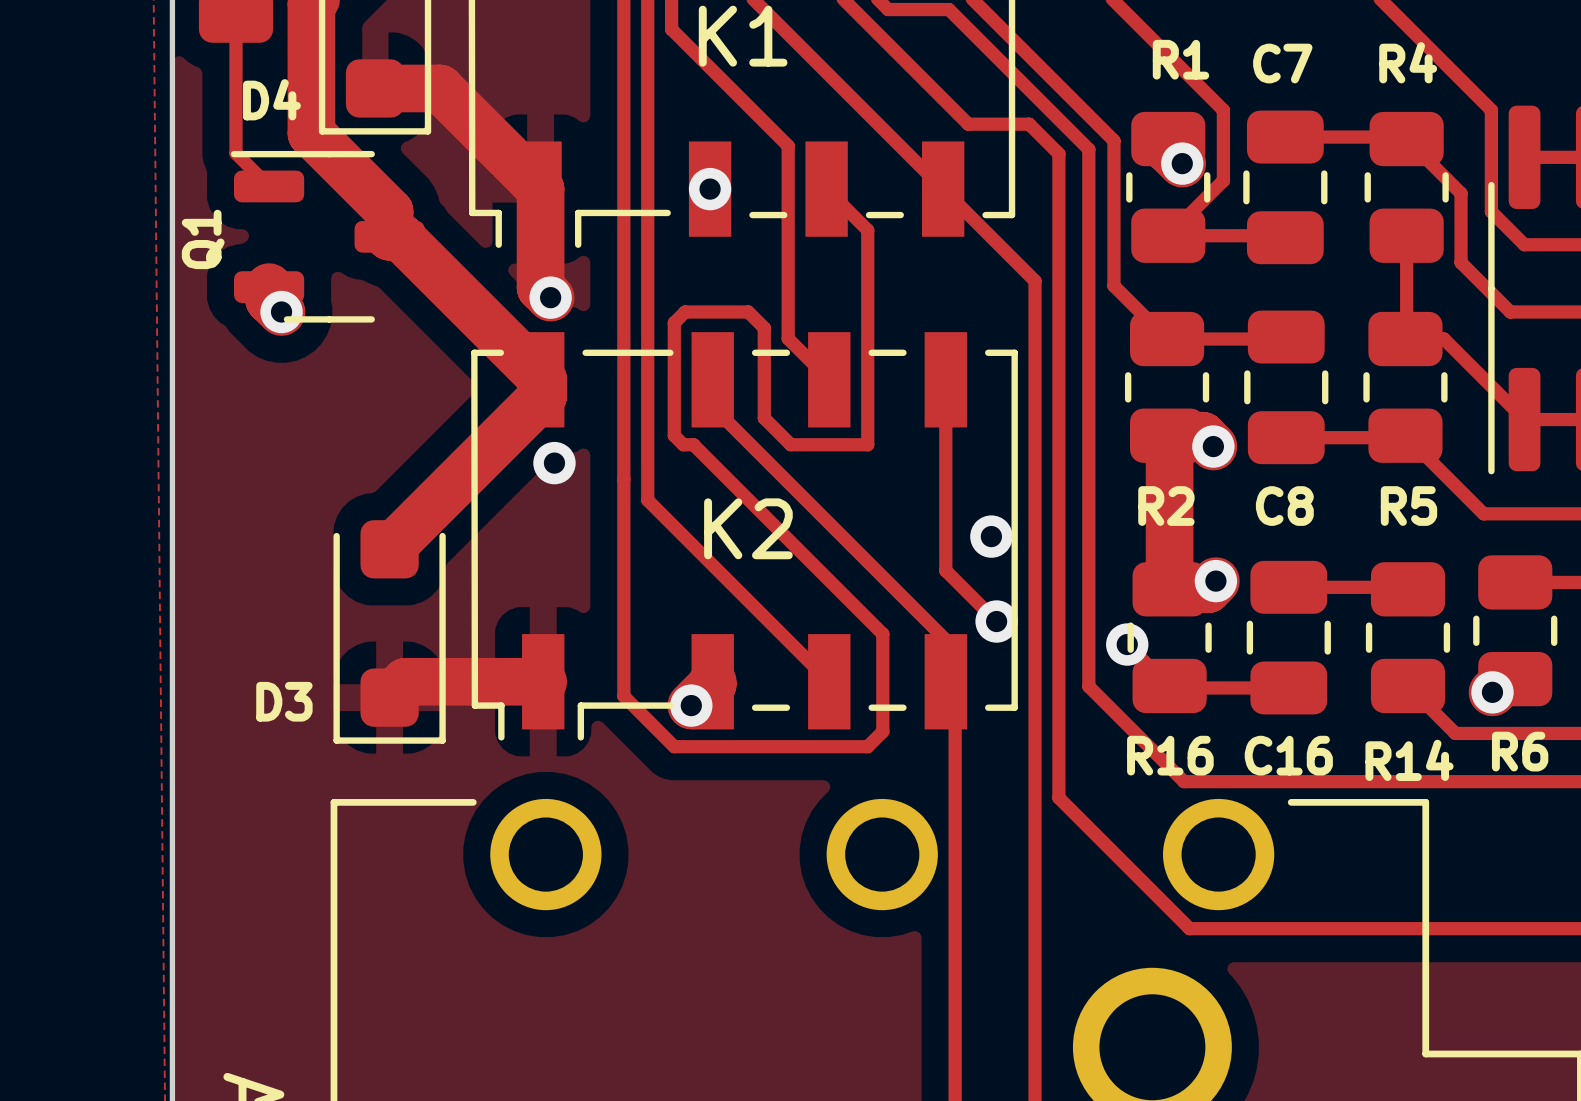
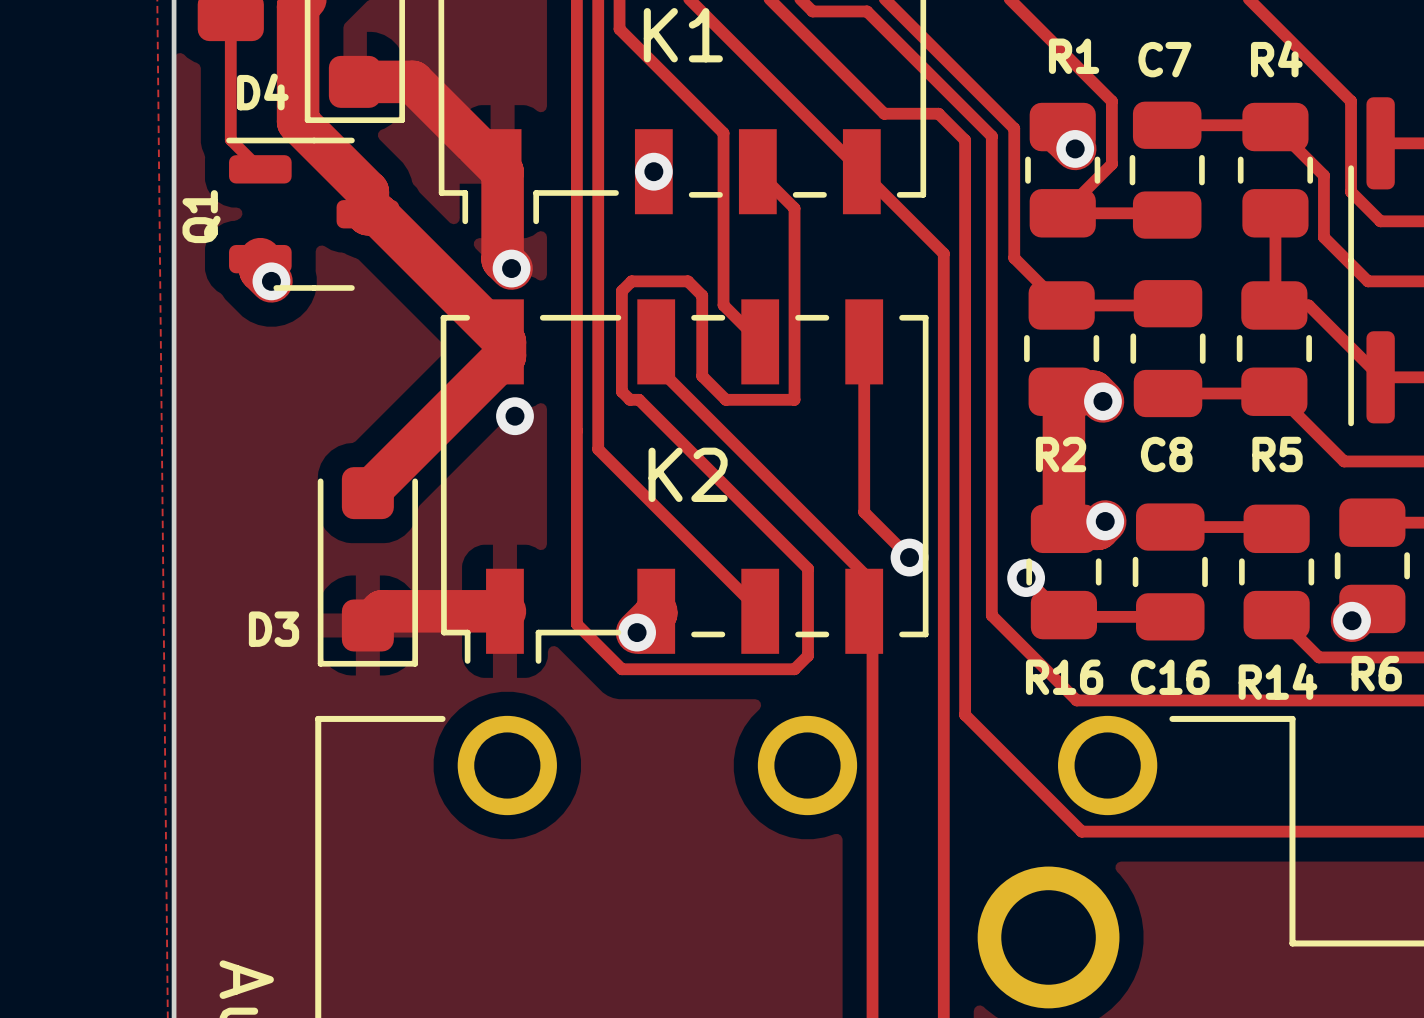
via: (991, 536) -> none

